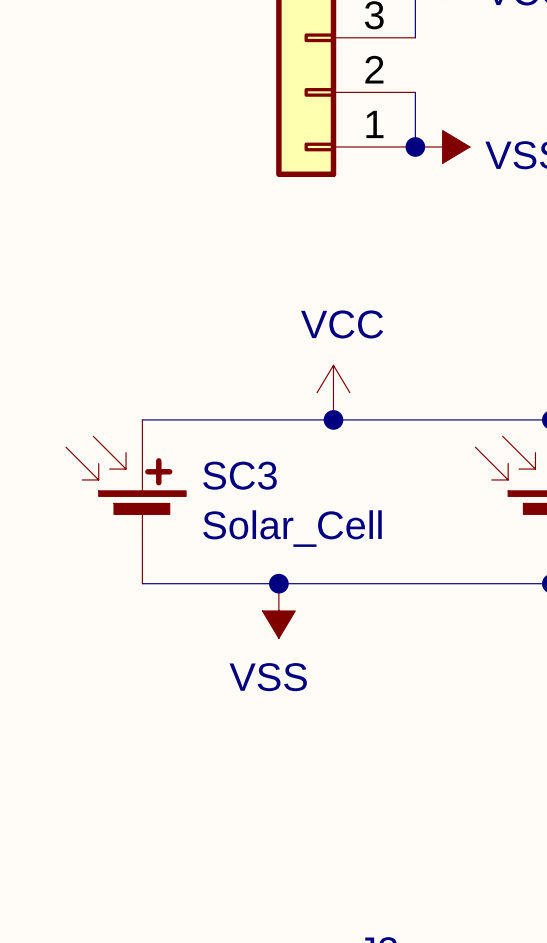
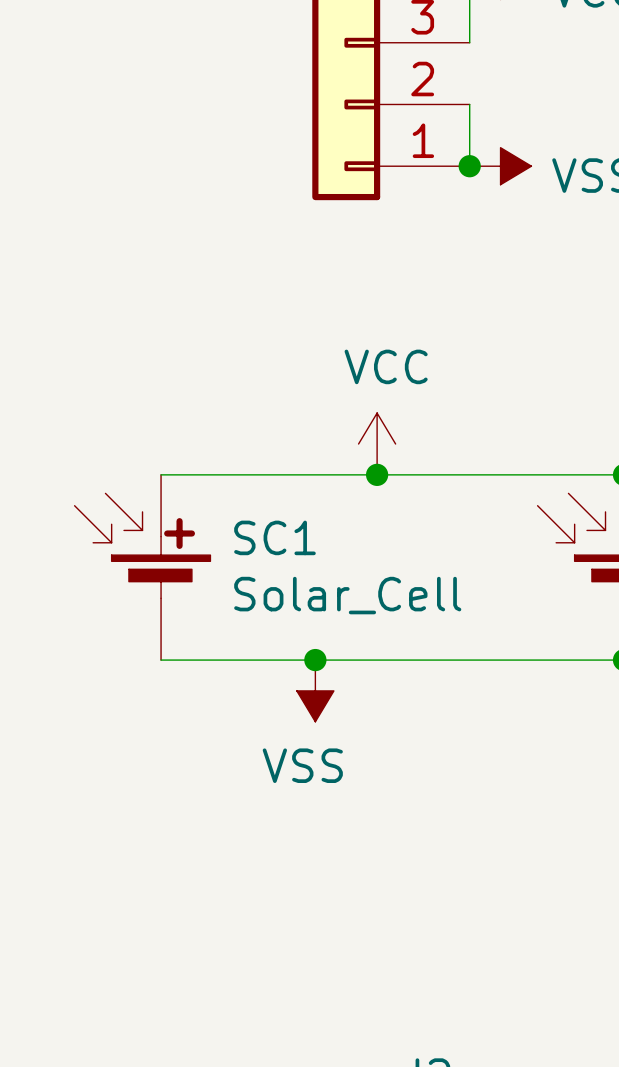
SC3 name: SC3 (239, 475) -> SC1 (274, 537)

